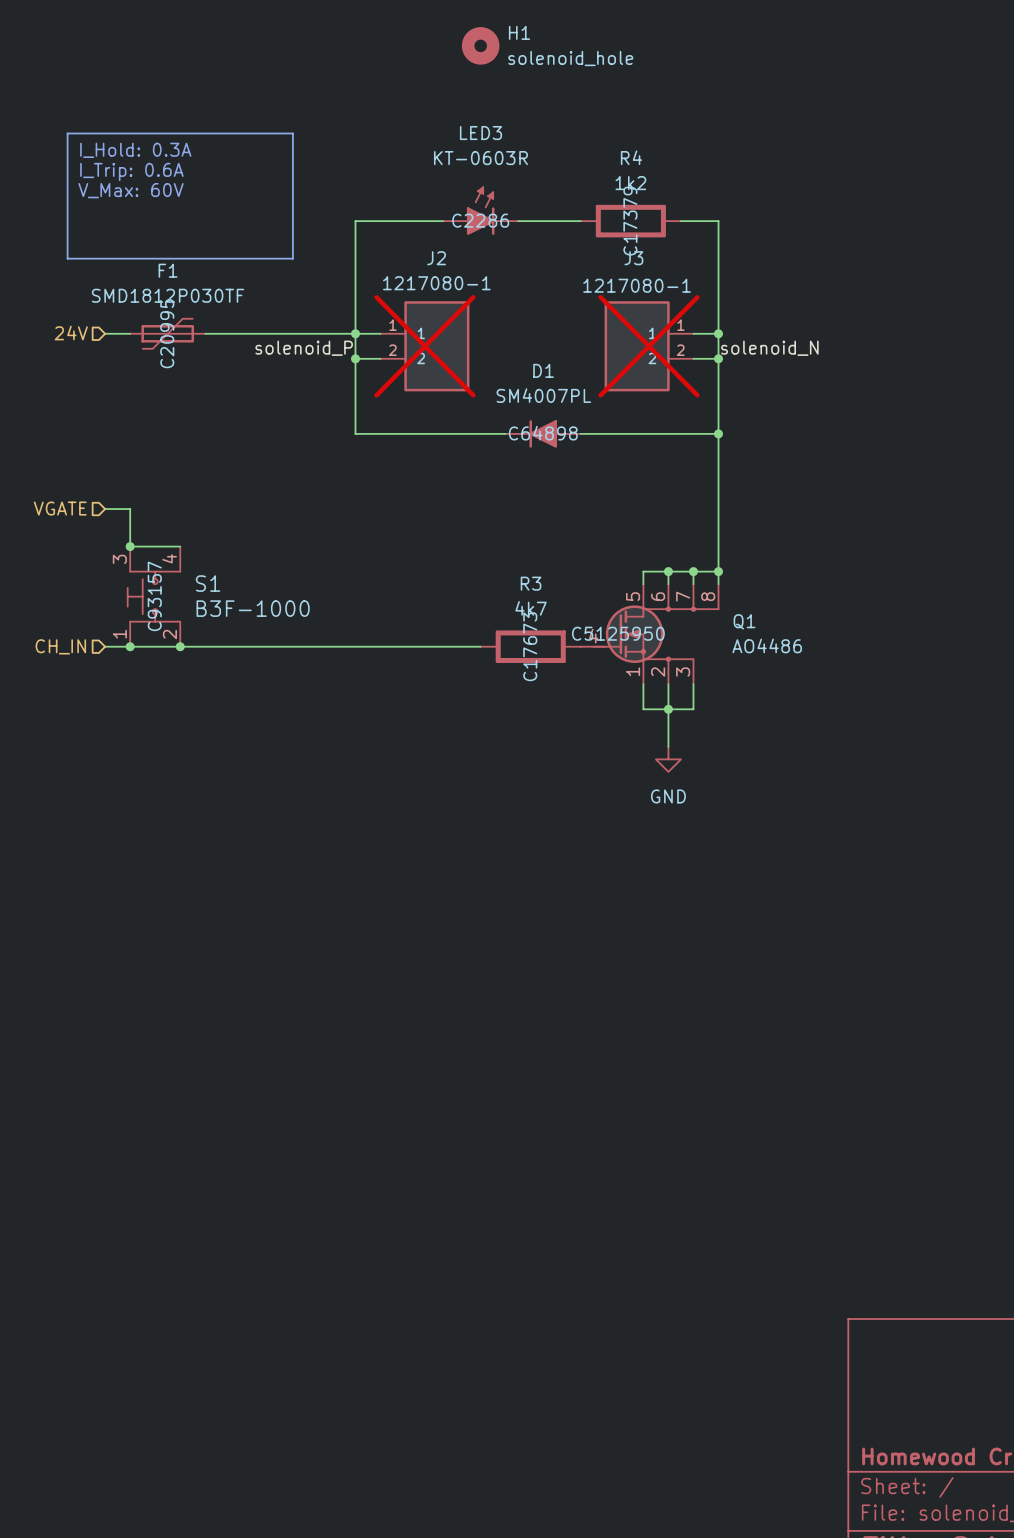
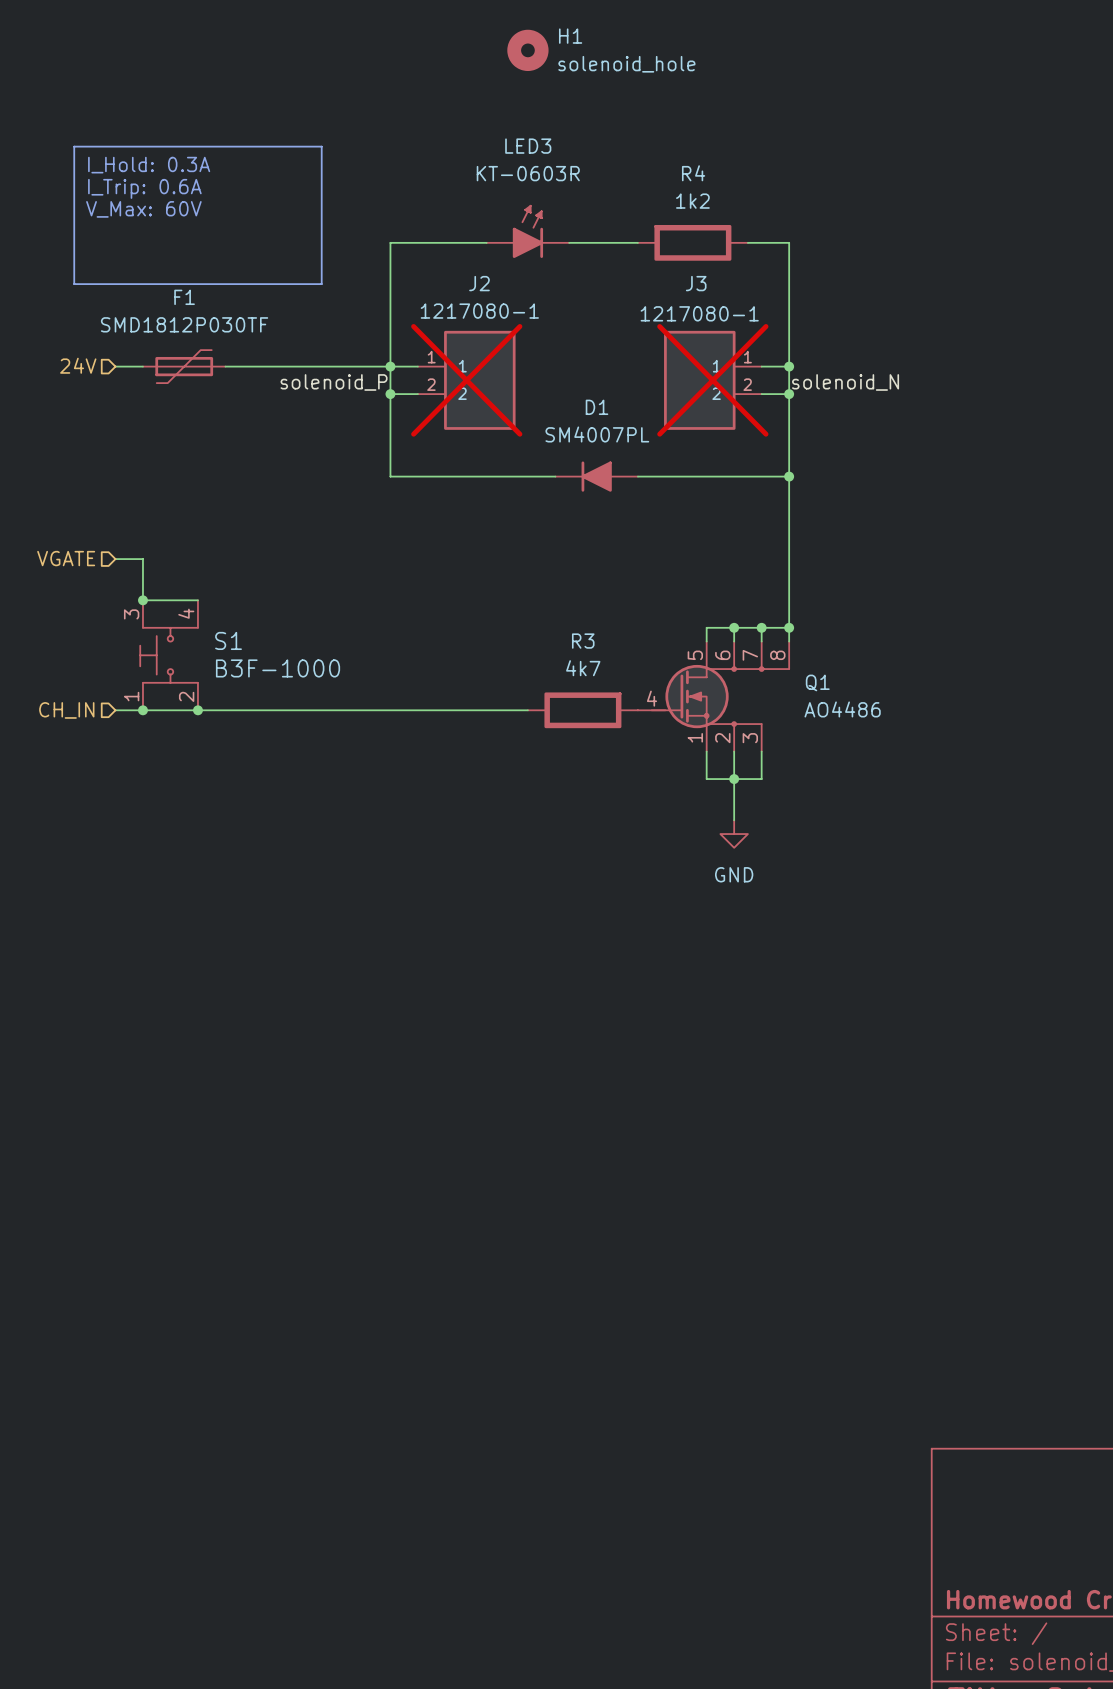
LED3 text: C2286 (480, 220) -> none
R4 text: C17379 (630, 221) -> none
F1 text: C20995 (167, 333) -> none
D1 text: C64898 (543, 433) -> none
S1 text: C93157 (154, 596) -> none
Q1 text: C5125950 (618, 633) -> none
R3 text: C17673 (530, 646) -> none

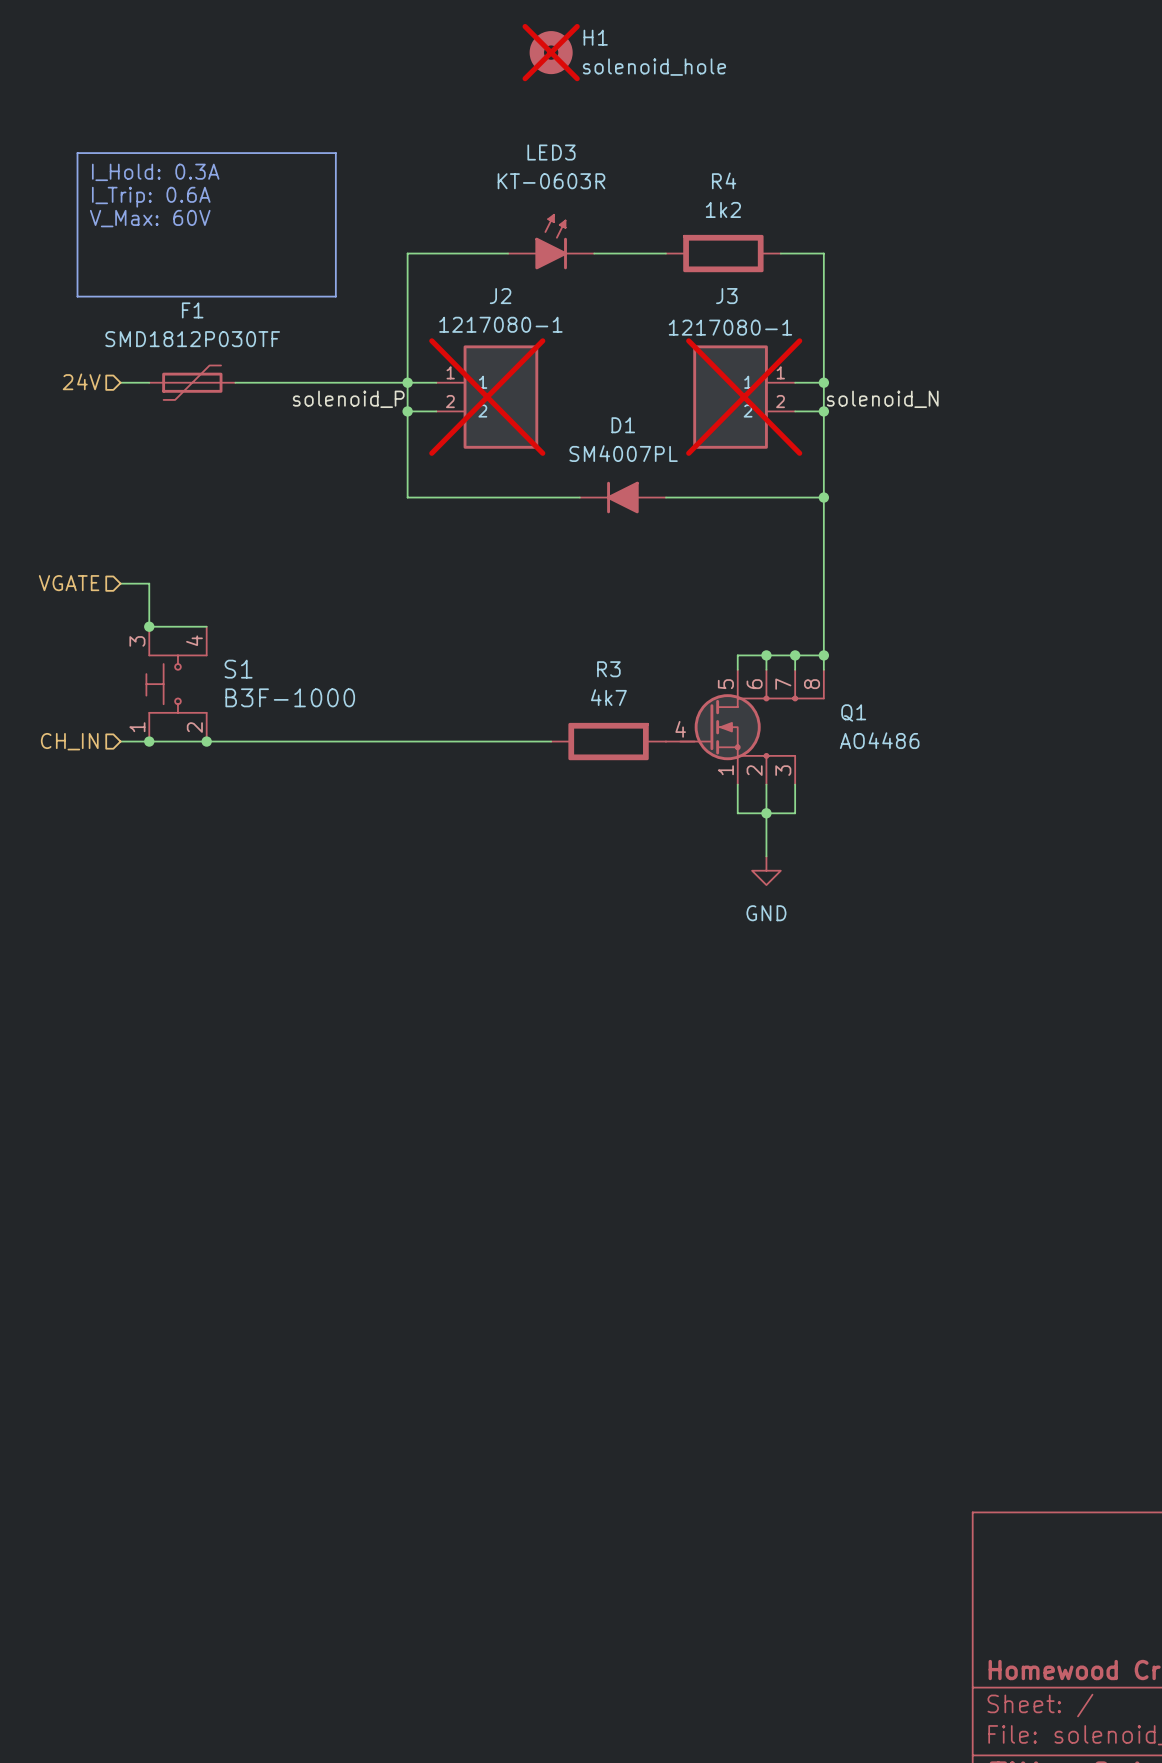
H1 do-not-place cross: none -> (551, 52)

